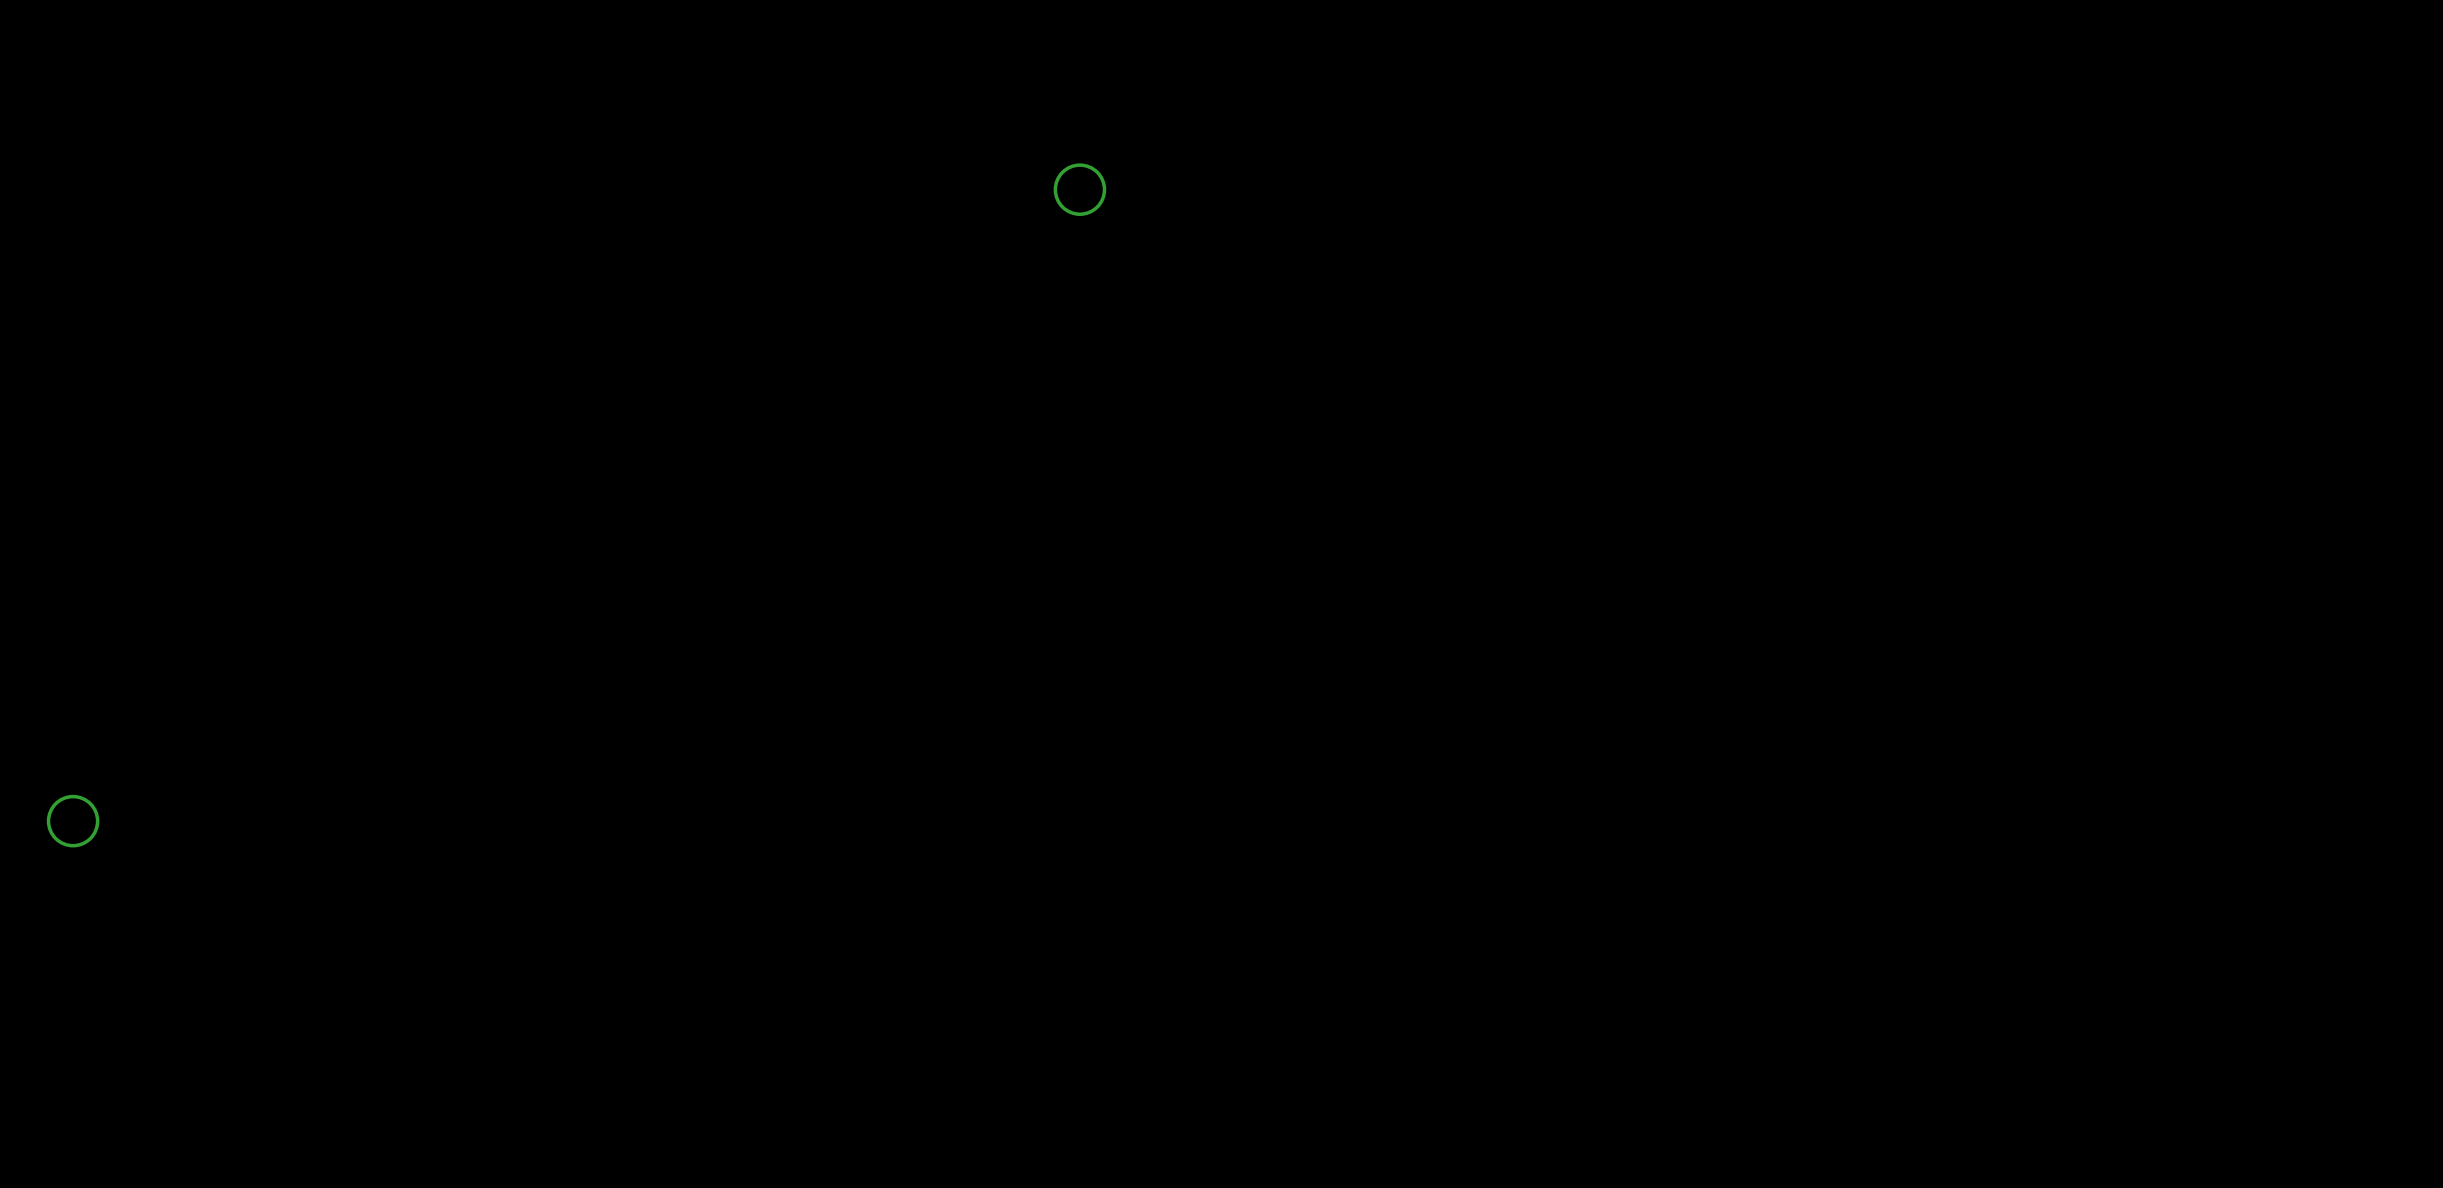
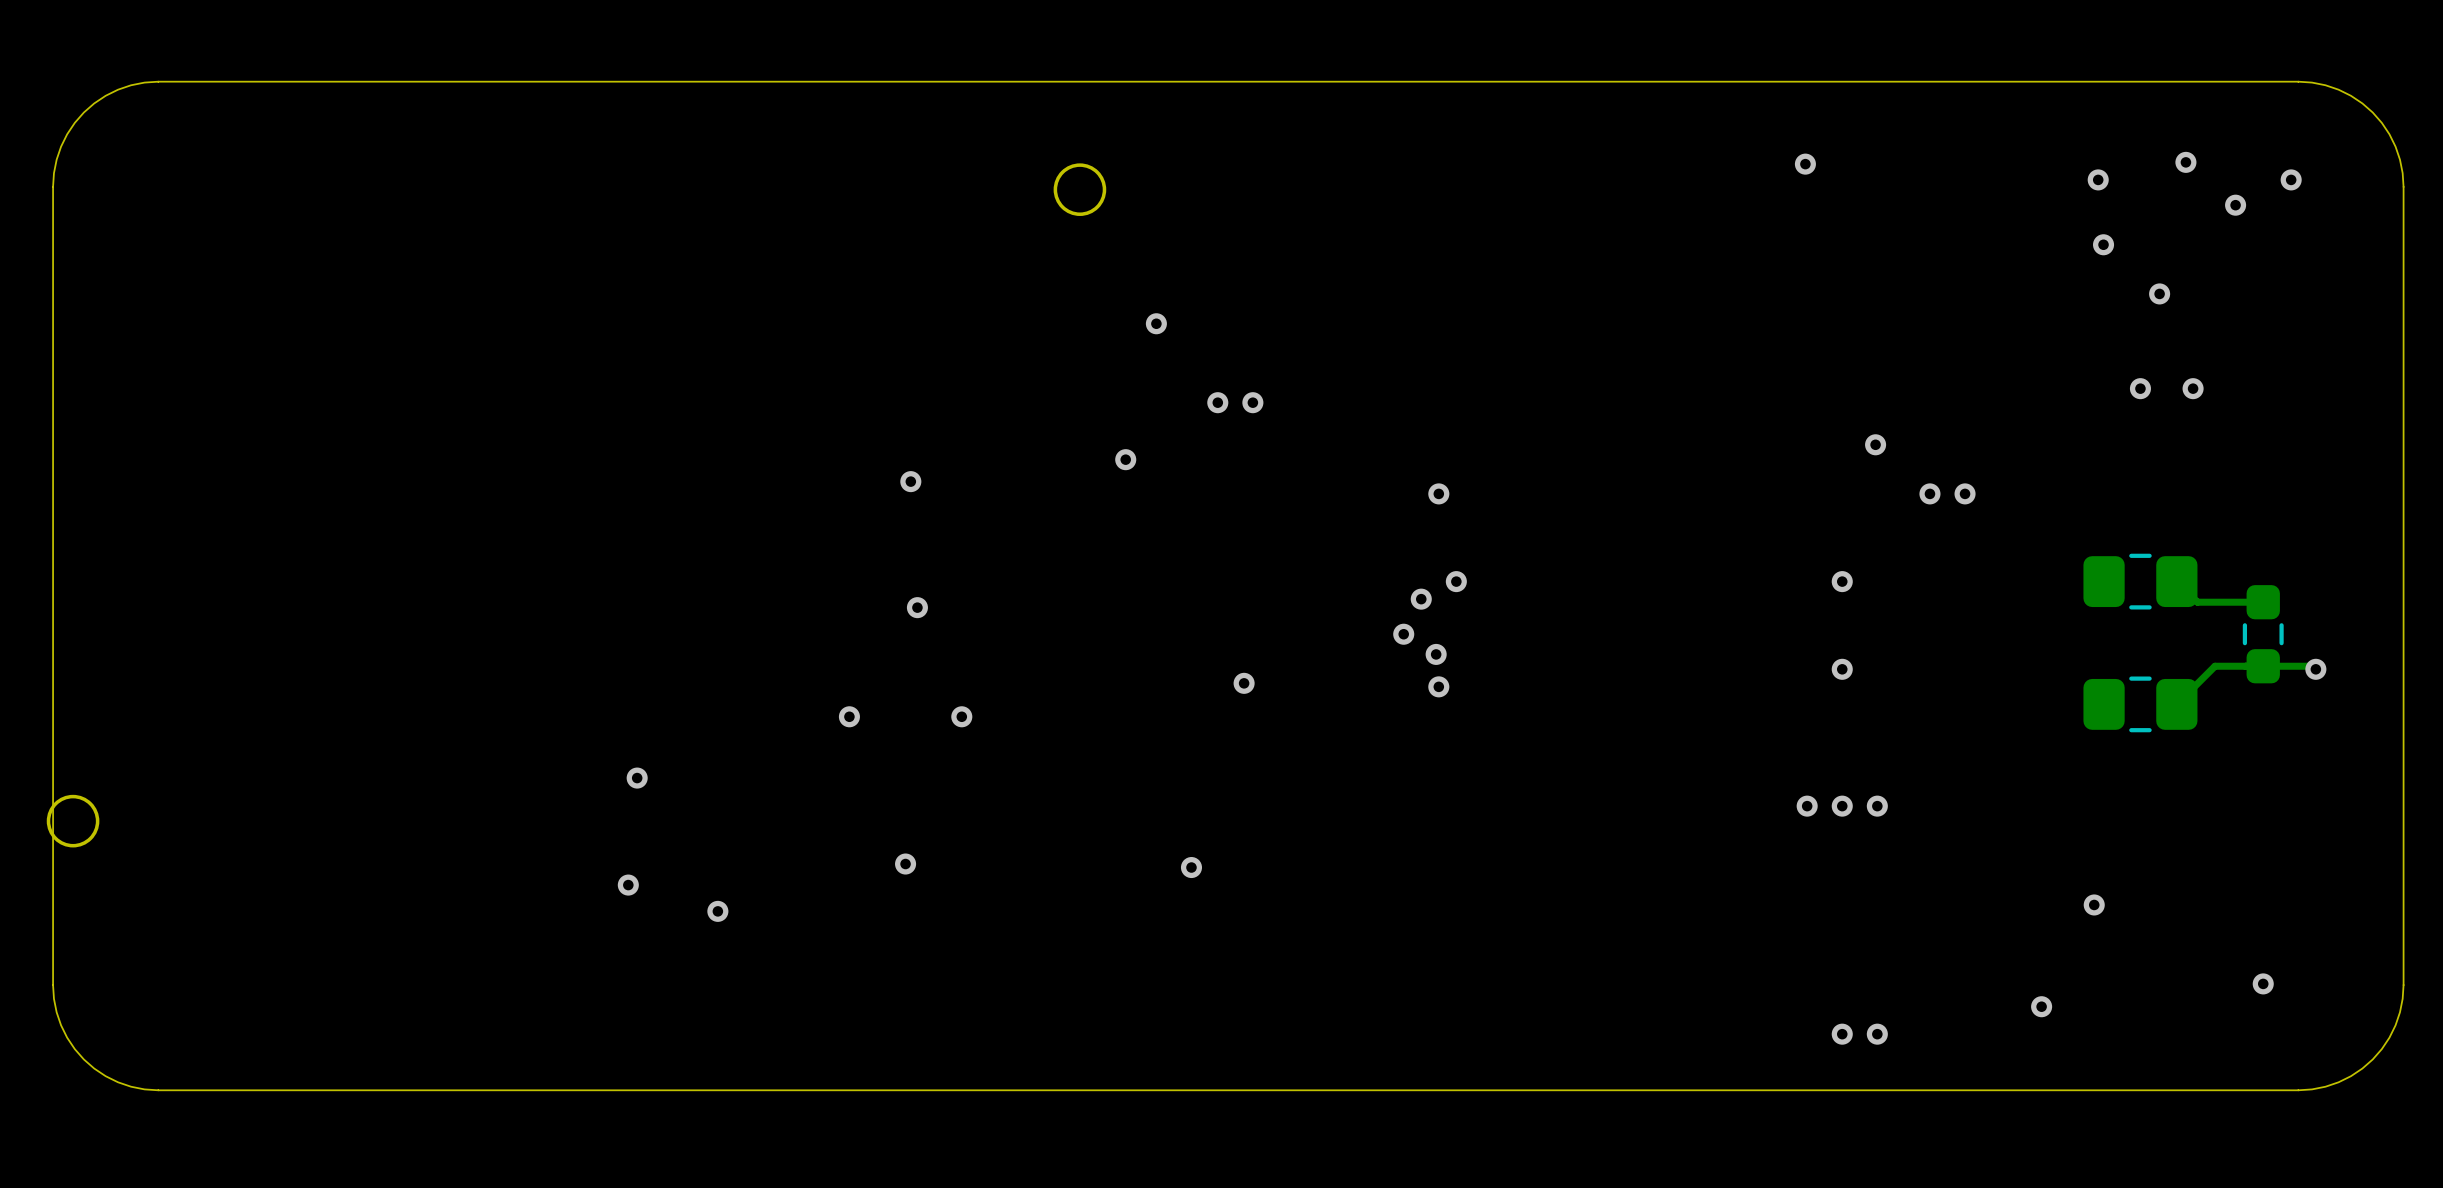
board edge: none -> (2298, 81) (158, 81) (131, 85) (118, 89) (94, 103) (74, 122) (61, 146) (56, 159) (53, 186) (53, 985) (53, 998) (61, 1025) (74, 1049) (94, 1068) (105, 1076) (131, 1086) (158, 1090) (2298, 1090) (2325, 1086) (2338, 1082) (2362, 1068) (2381, 1049) (2395, 1025) (2402, 998) (2403, 186) (2399, 159) (2395, 146) (2381, 122) (2372, 112) (2350, 95) (2338, 89) (2312, 82) (2298, 81)
via: none -> (2185, 162)
via: none -> (1805, 164)
via: none -> (2098, 179)
via: none -> (2291, 179)
via: none -> (2235, 205)
via: none -> (2103, 244)
via: none -> (2159, 293)
via: none -> (1156, 323)
via: none -> (2140, 388)
via: none -> (2193, 388)
via: none -> (1217, 402)
via: none -> (1252, 402)
via: none -> (1875, 444)
via: none -> (1125, 459)
via: none -> (910, 481)
via: none -> (1438, 493)
via: none -> (1929, 493)
via: none -> (1965, 493)
via: none -> (1456, 581)
via: none -> (1842, 581)
part: none -> (2140, 581)
track: none -> (2176, 581) (2197, 602) (2263, 602)
via: none -> (1421, 599)
via: none -> (917, 607)
via: none -> (1403, 634)
part: none -> (2263, 634)
via: none -> (1436, 654)
via: none -> (1842, 669)
track: none -> (2315, 669) (2312, 666) (2215, 666) (2176, 704)
via: none -> (2315, 669)
via: none -> (1244, 683)
via: none -> (1438, 686)
part: none -> (2140, 704)
via: none -> (849, 716)
via: none -> (961, 716)
via: none -> (637, 778)
via: none -> (1807, 806)
via: none -> (1842, 806)
via: none -> (1877, 806)
via: none -> (905, 864)
via: none -> (1191, 867)
via: none -> (628, 885)
via: none -> (2094, 904)
via: none -> (717, 911)
via: none -> (2263, 983)
via: none -> (2041, 1006)
via: none -> (1842, 1034)
via: none -> (1877, 1034)

